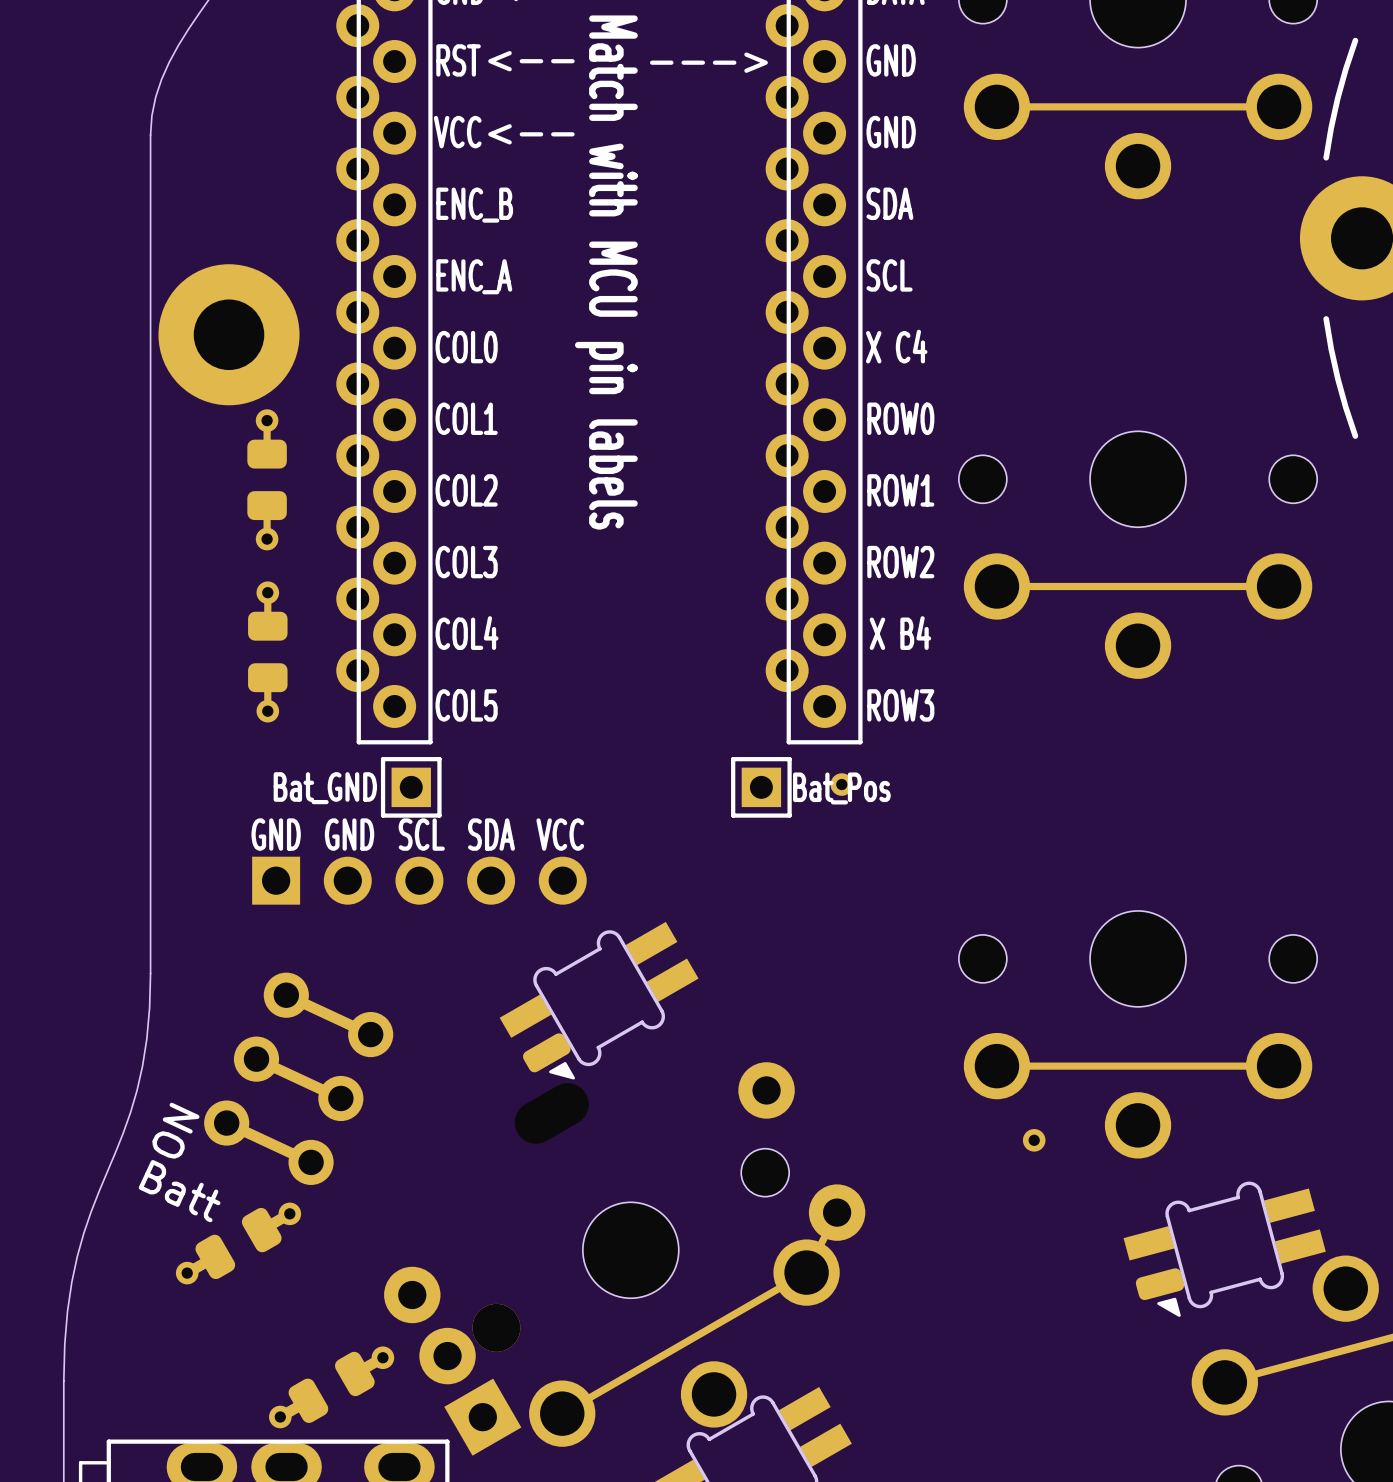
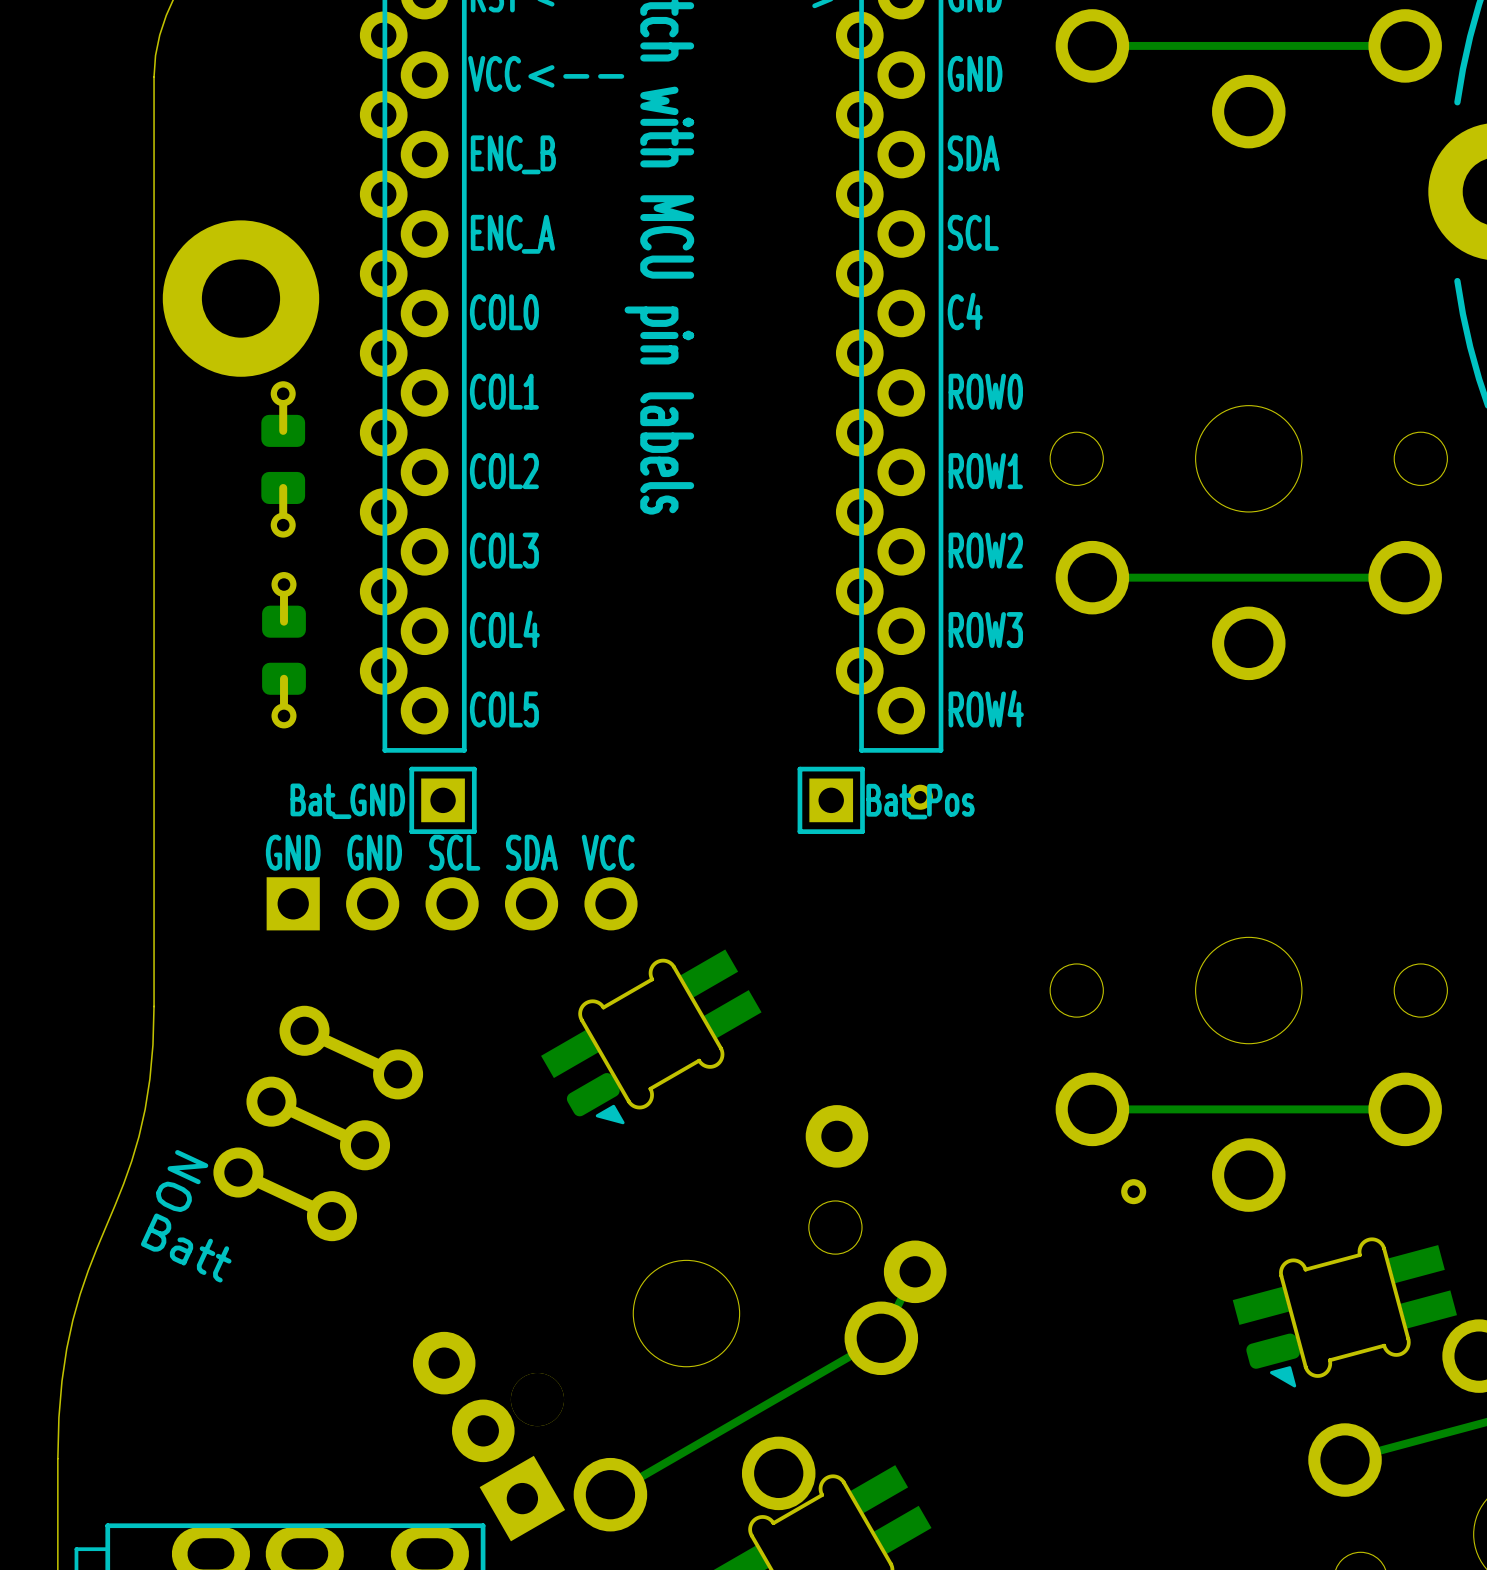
part text: none -> C4 (965, 311)
part text: X C4 (896, 346) -> none
part text: X B4 (900, 633) -> ROW3 (985, 630)
part text: ROW3 (900, 705) -> ROW4 (986, 708)
part: (238, 1243) -> none
part: (331, 1387) -> none

